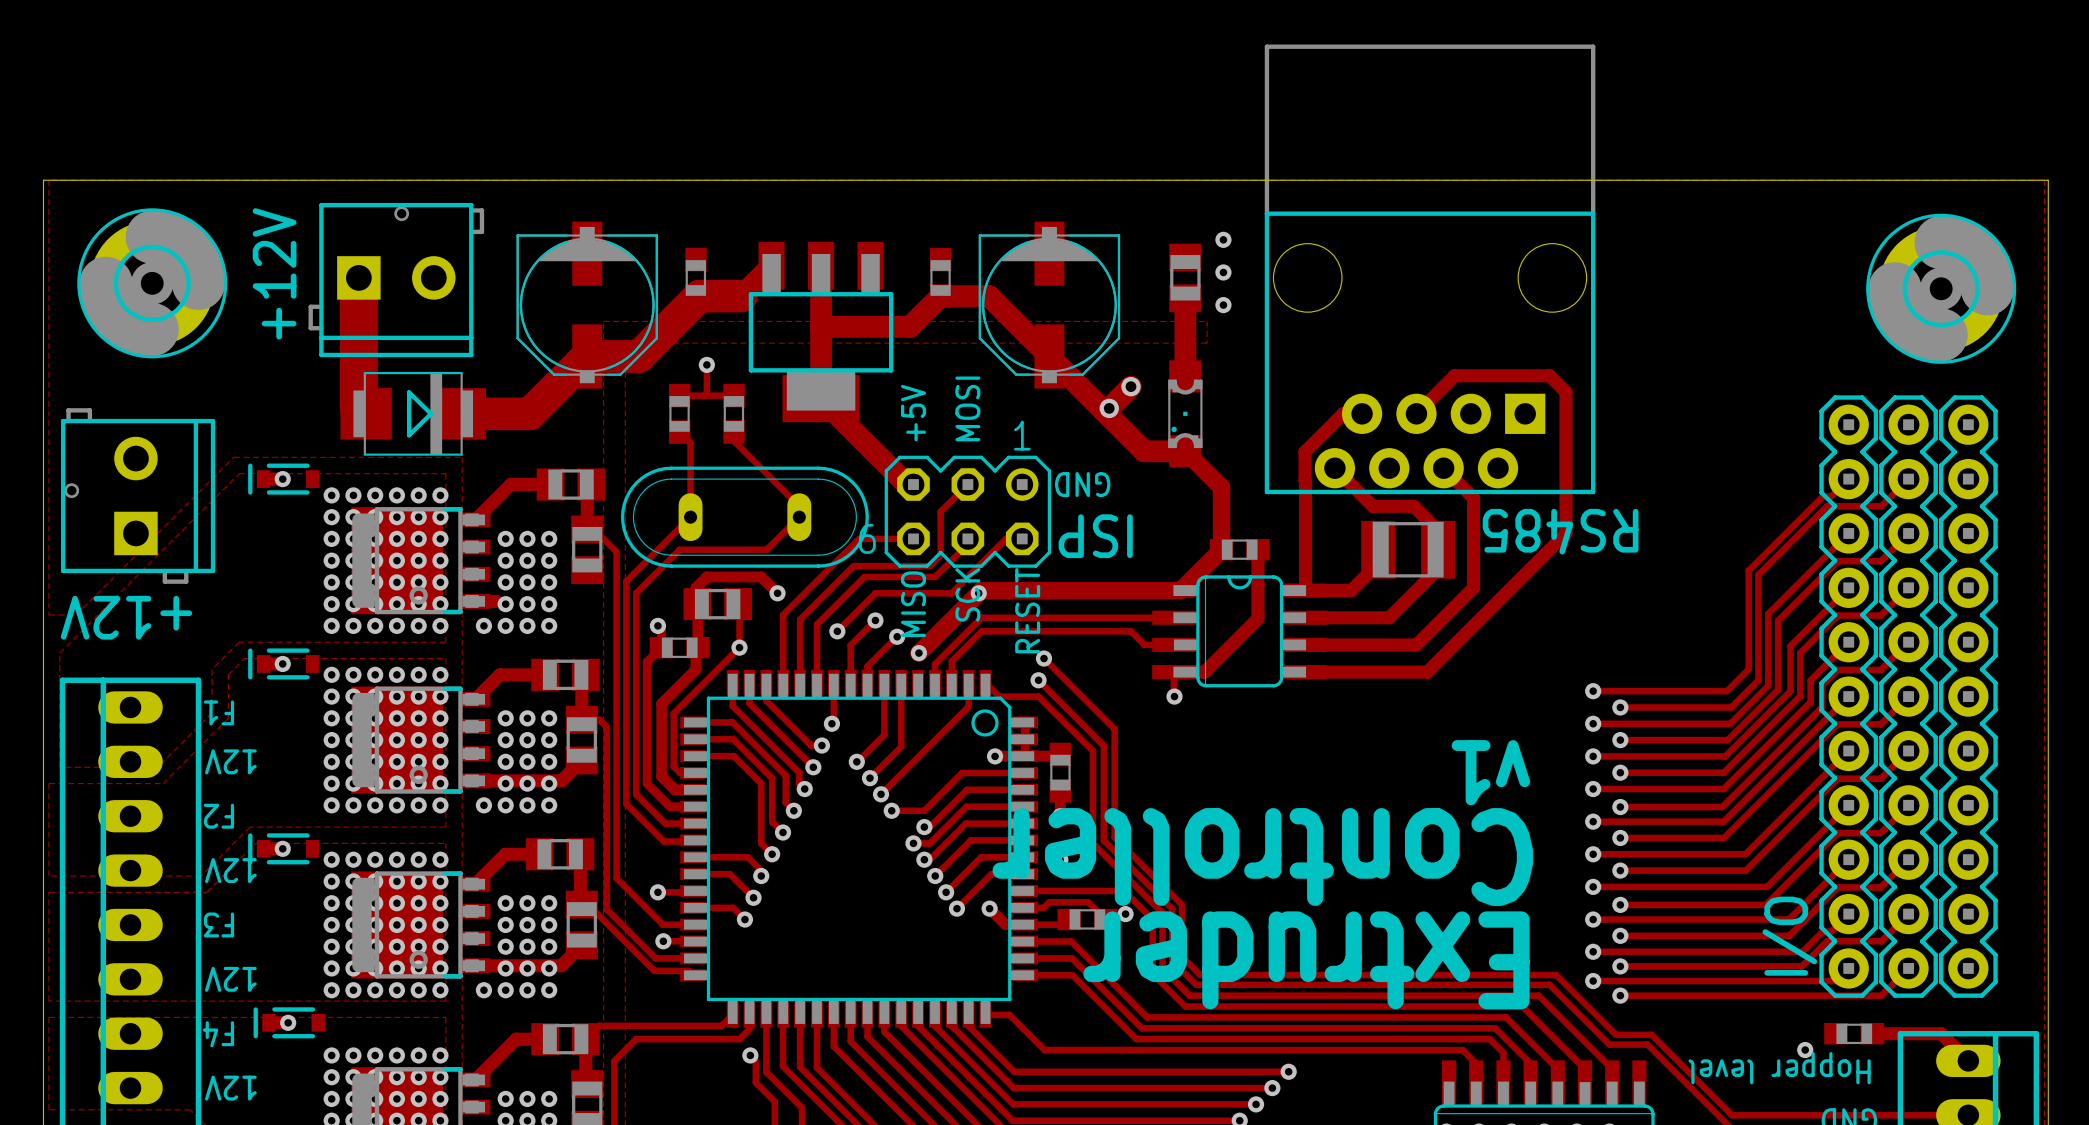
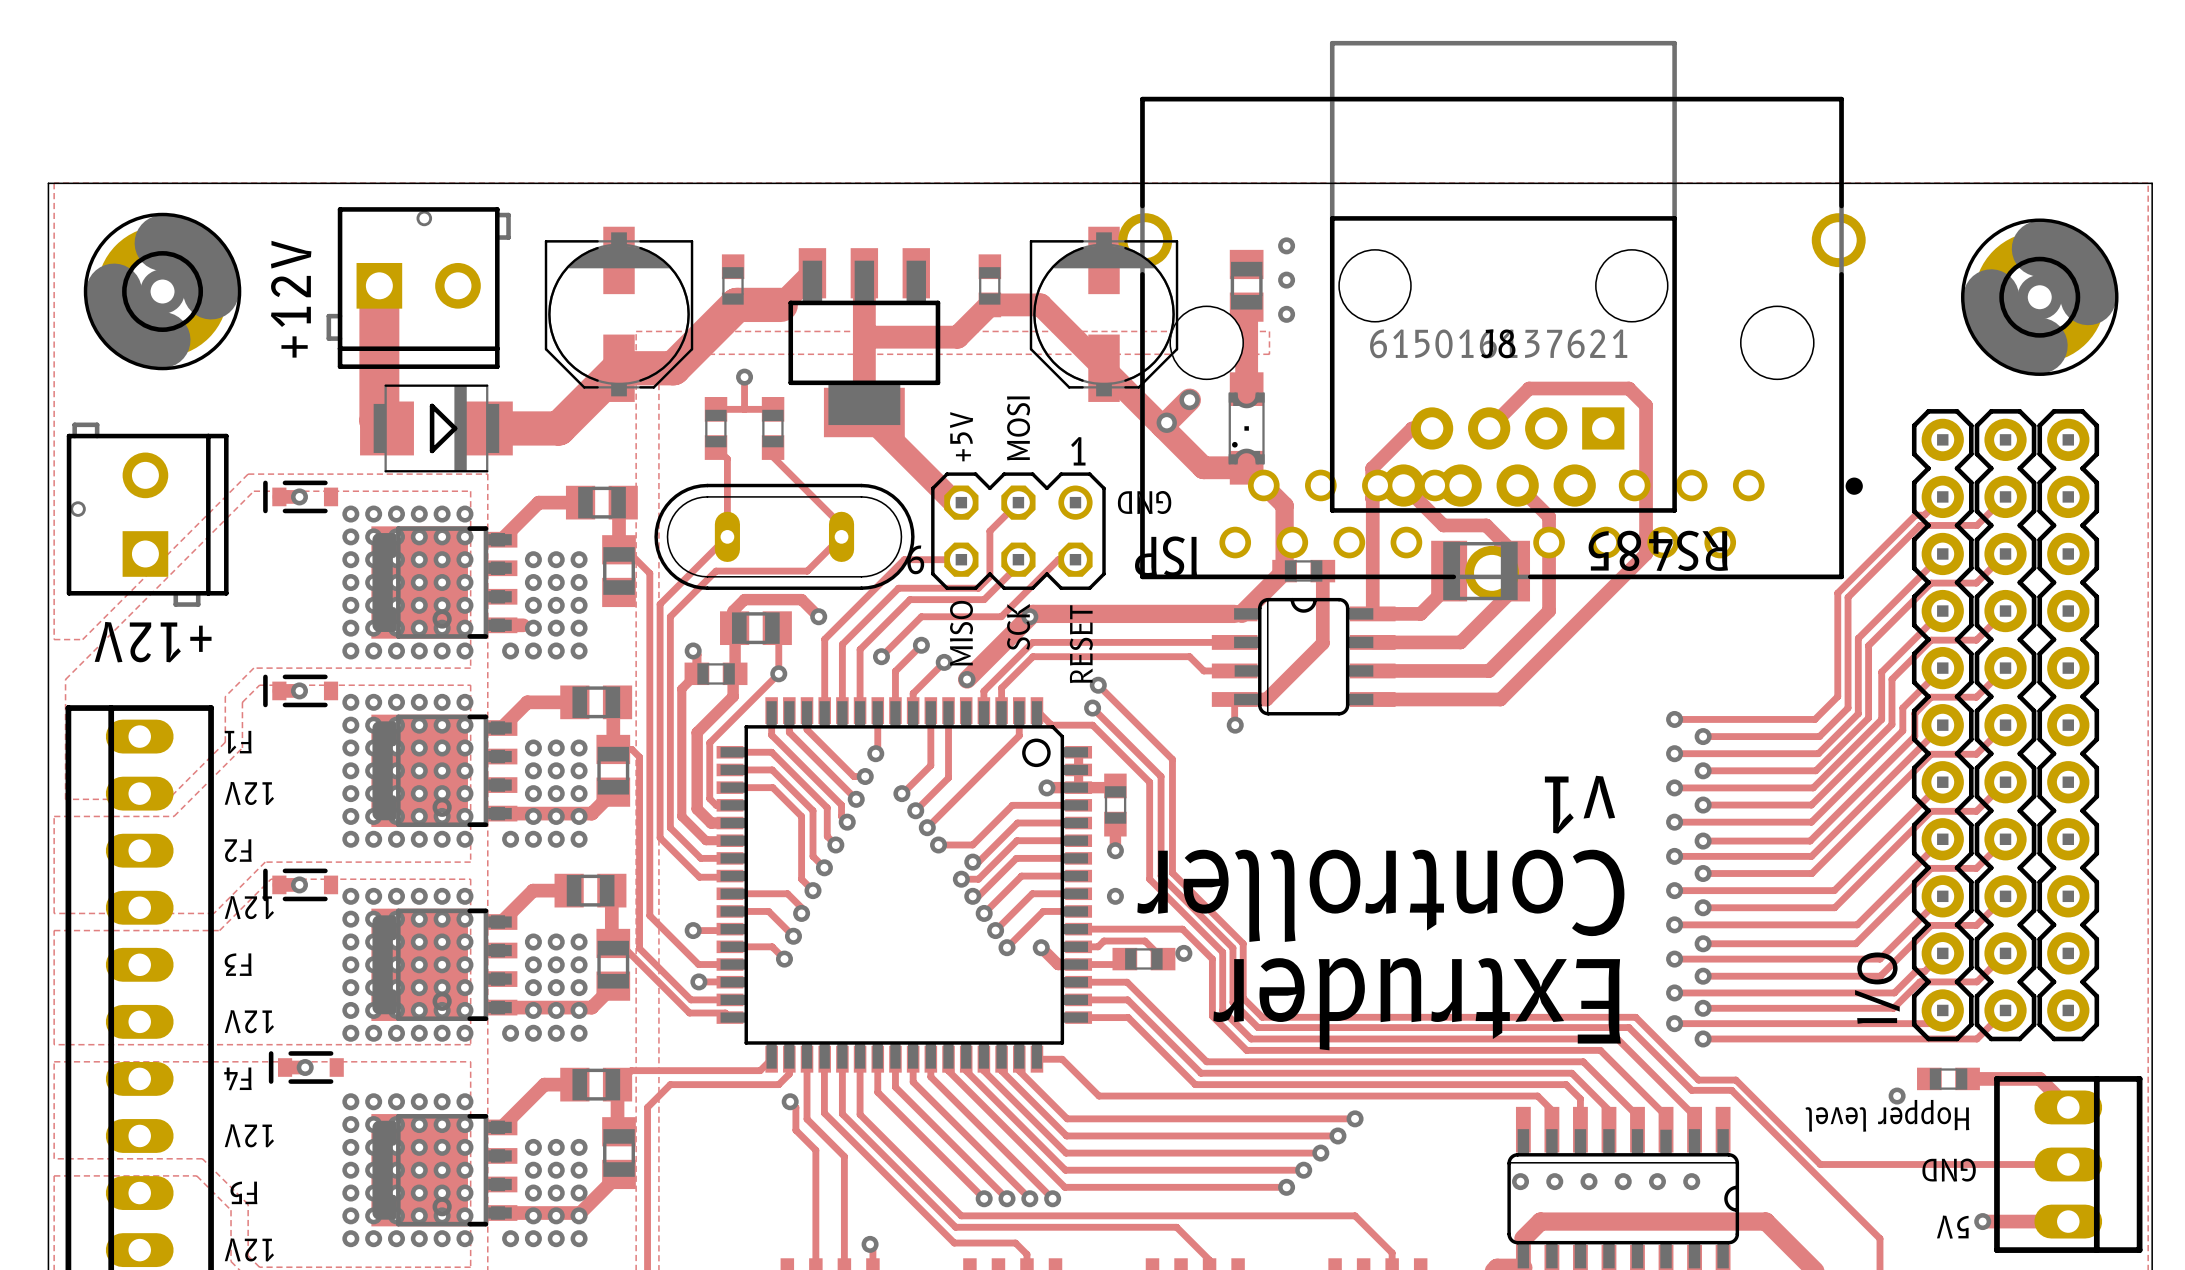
J8: none -> 615016137621 (1492, 348)

